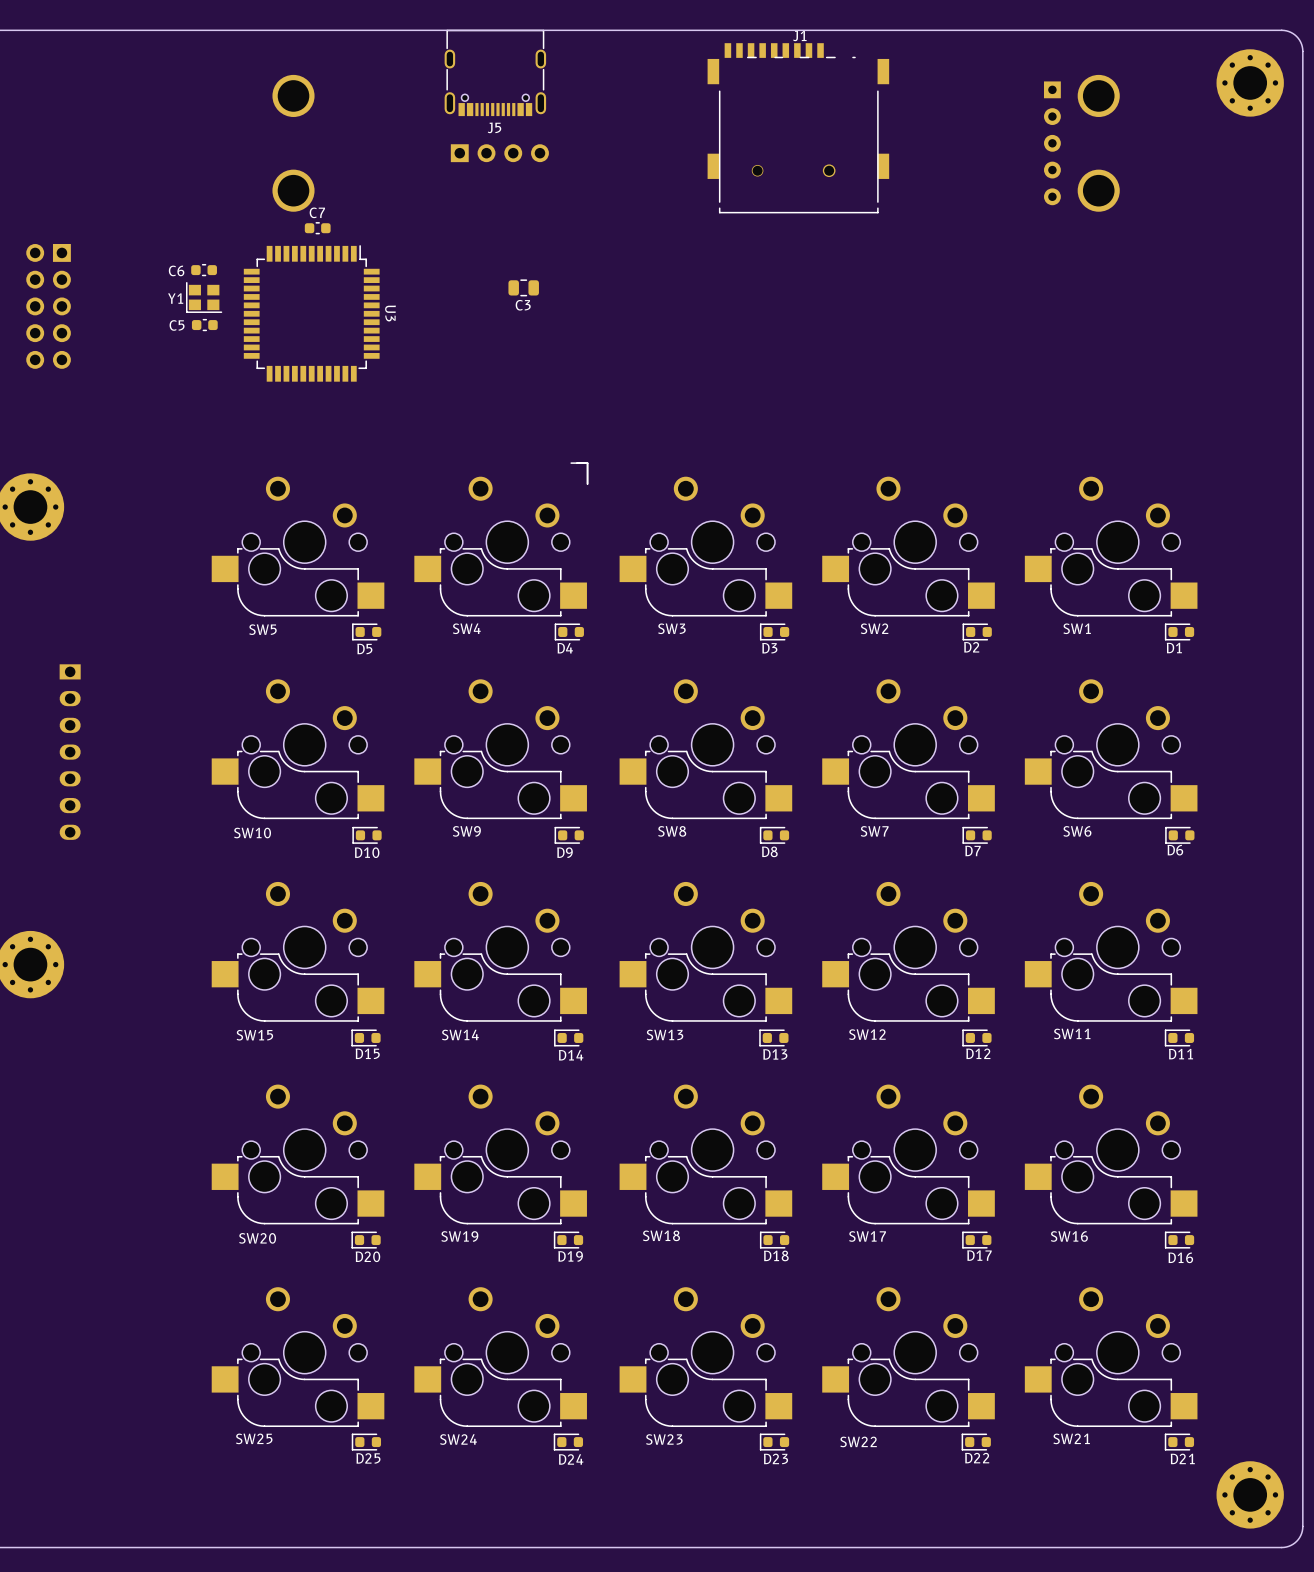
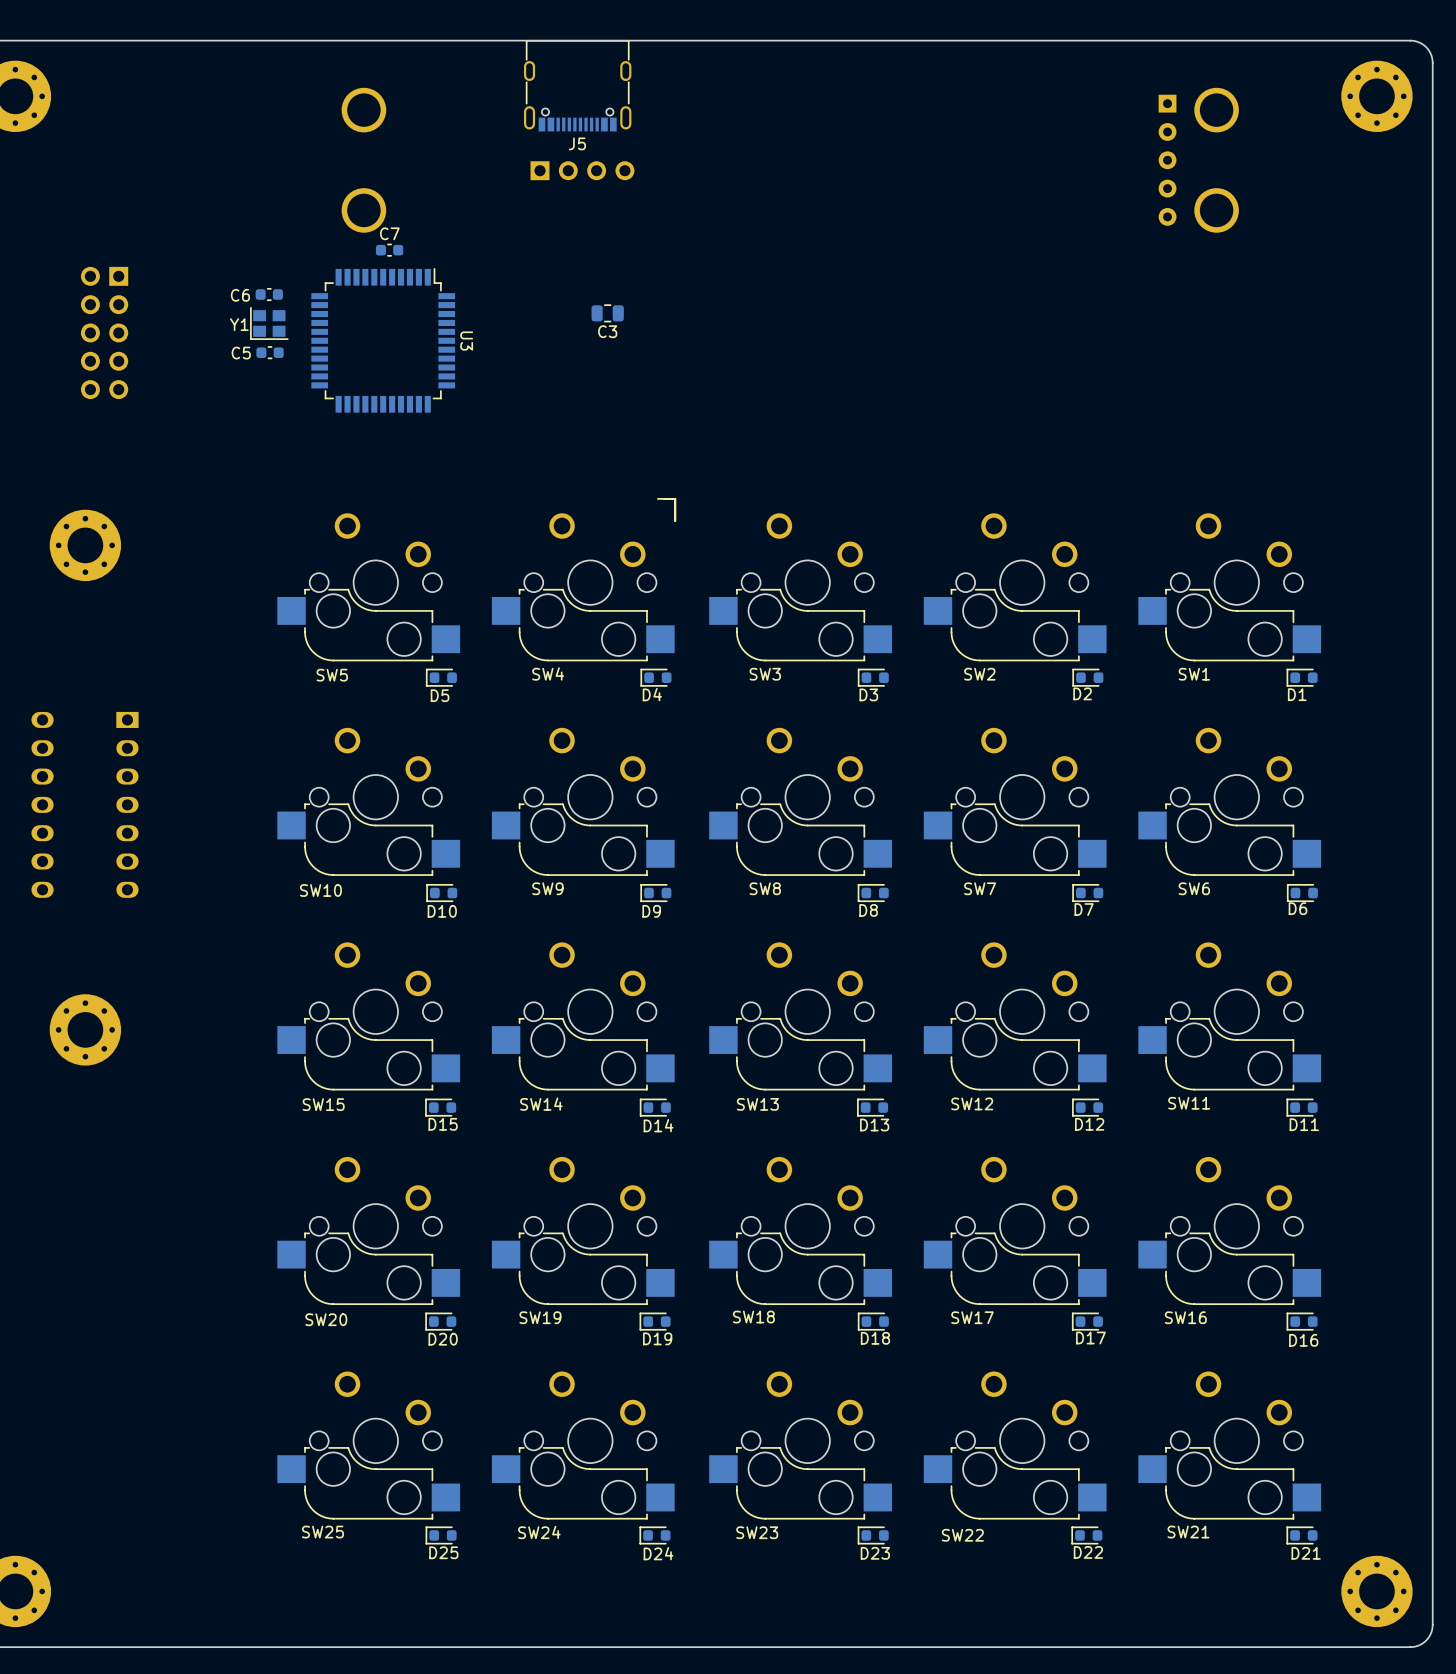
J1: (798, 128) -> none

